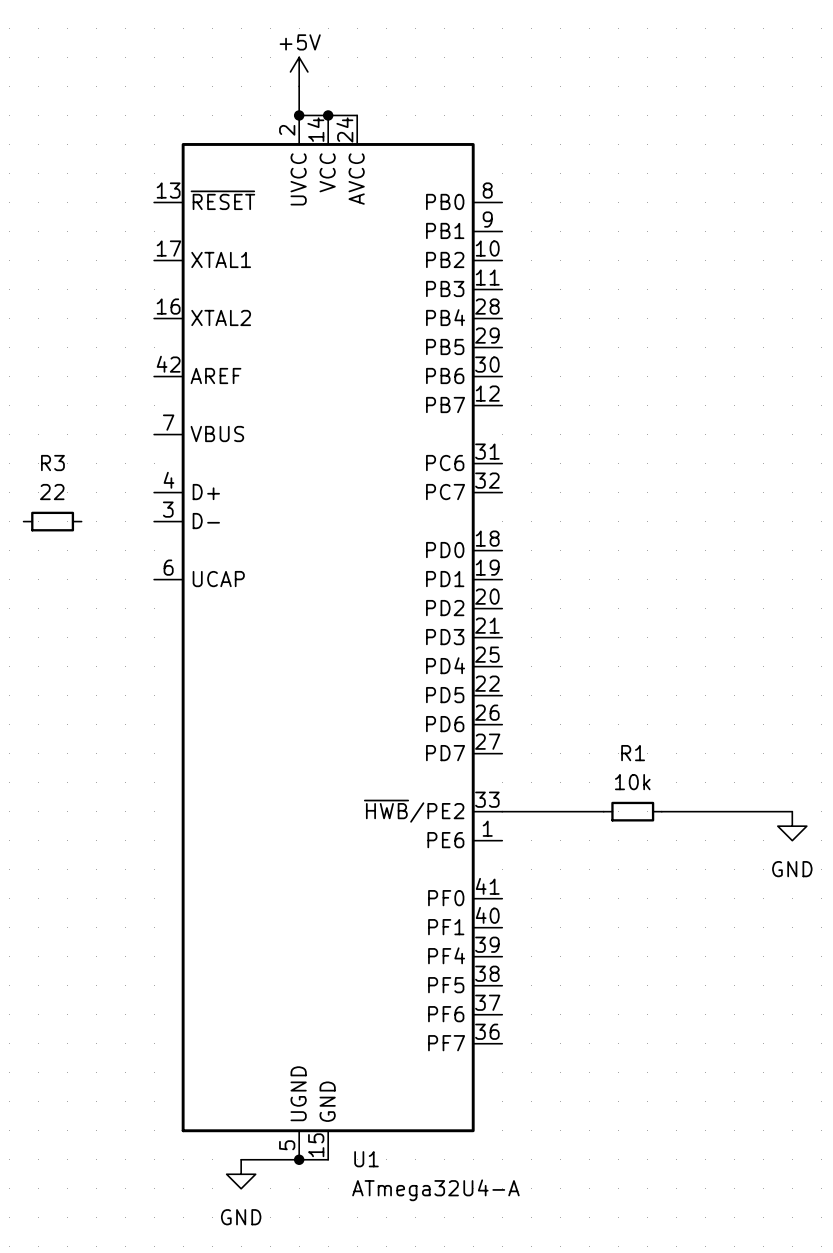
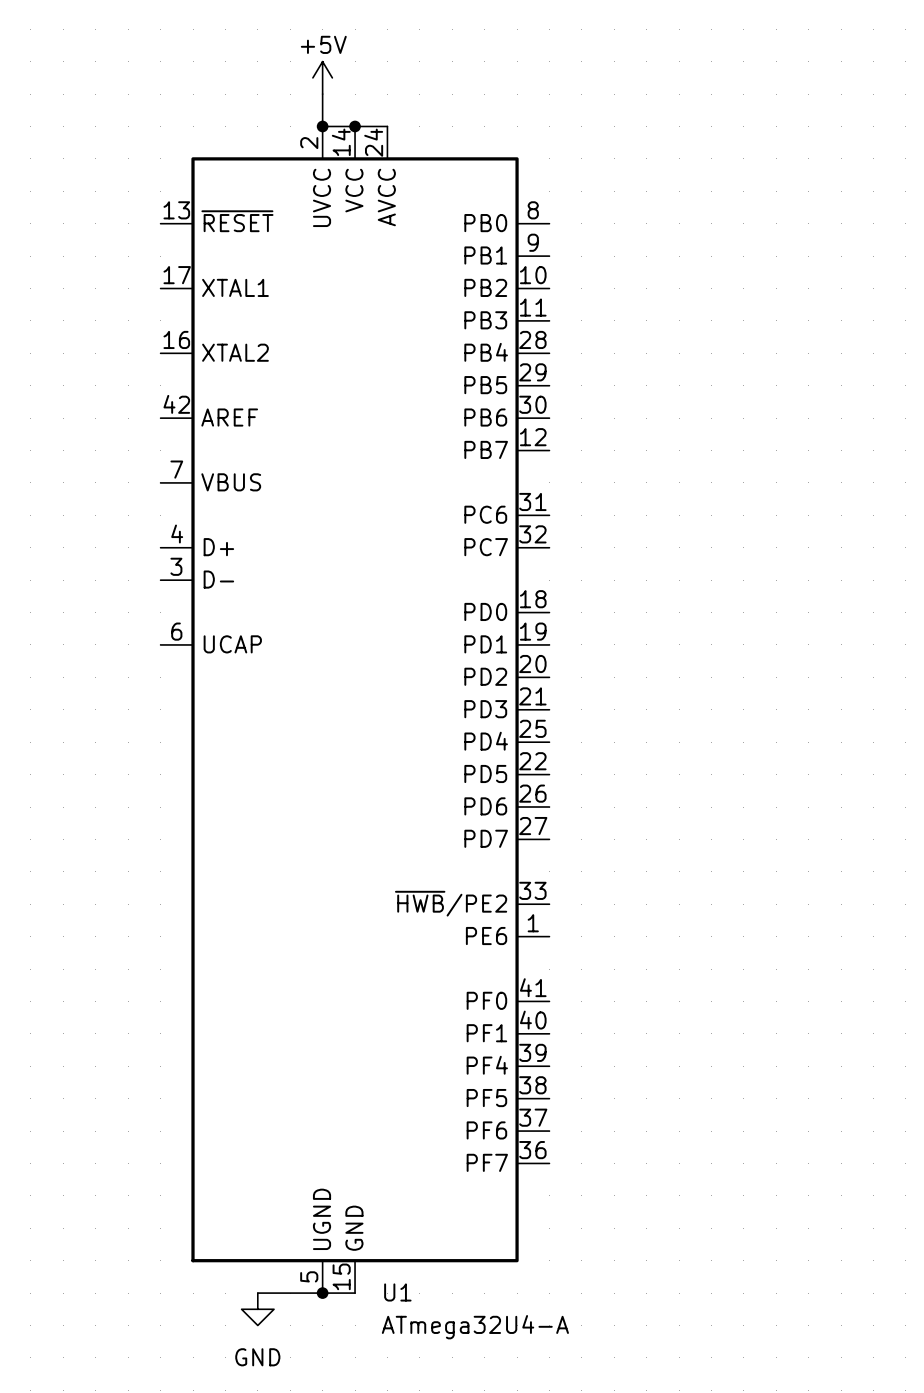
R3: 22 (52, 521) -> none
wire: (502, 811) (603, 811) -> none
R1: 10k (632, 811) -> none
wire: (661, 811) (792, 811) -> none
power symbol: GND (792, 826) -> none

